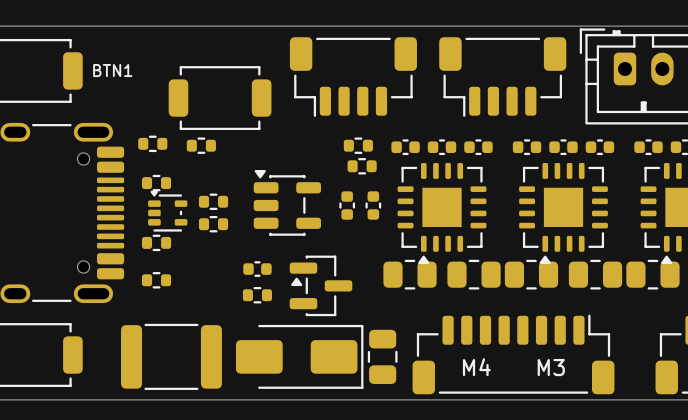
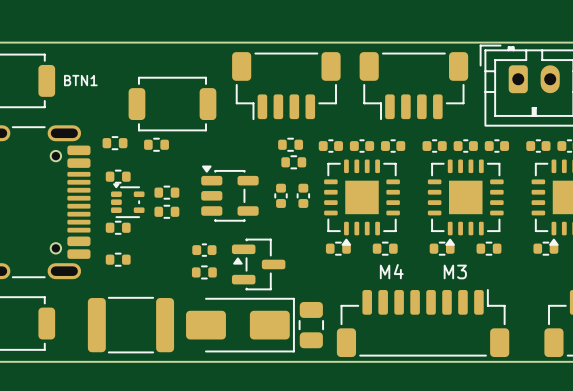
part footprint: [383, 259, 437, 290] -> [325, 241, 351, 256]
part footprint: [447, 259, 501, 290] -> [372, 241, 398, 256]
part footprint: [504, 259, 559, 290] -> [429, 241, 455, 256]
part footprint: [568, 259, 623, 290] -> [476, 241, 502, 256]
part footprint: [626, 259, 680, 290] -> [533, 241, 559, 256]
text position: M4 (476, 367) -> M4 (391, 271)
text position: M3 (551, 367) -> M3 (455, 271)

